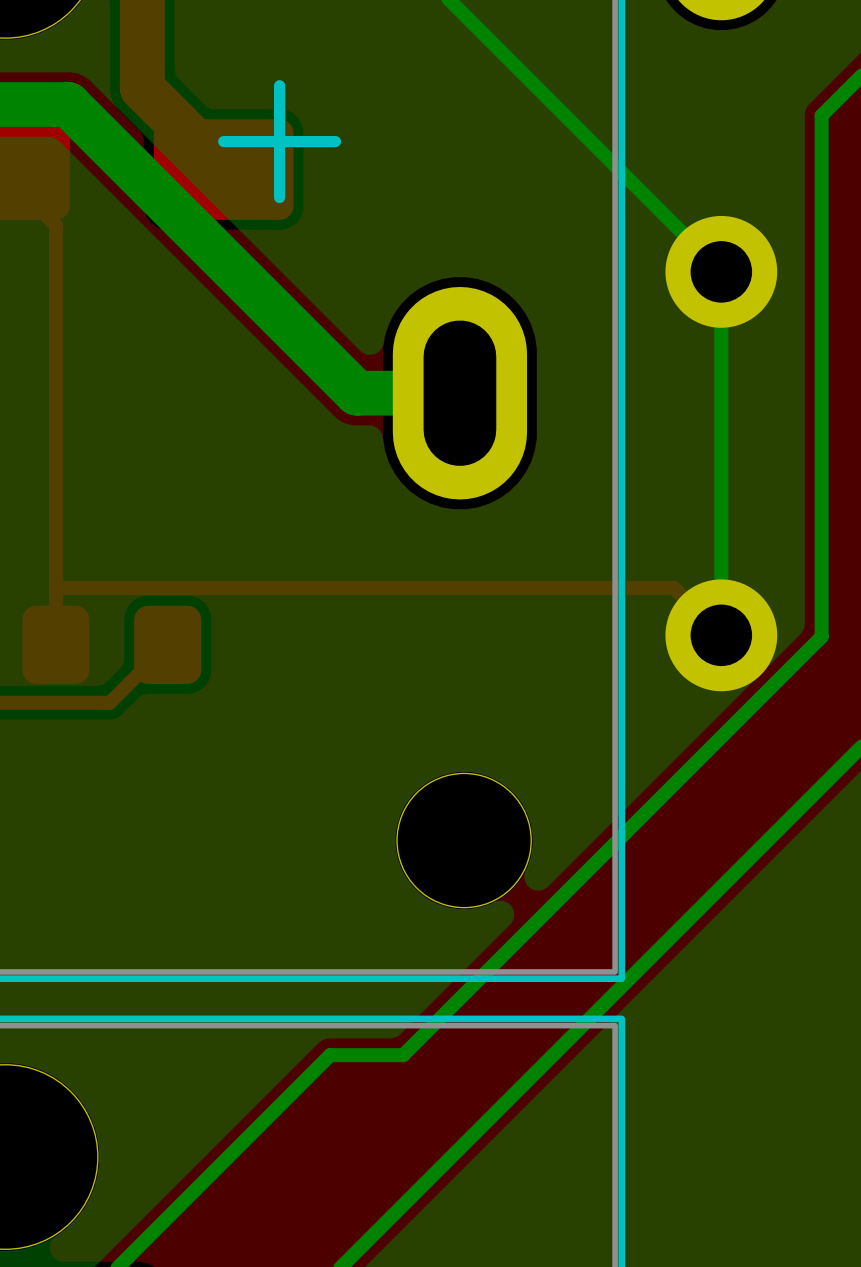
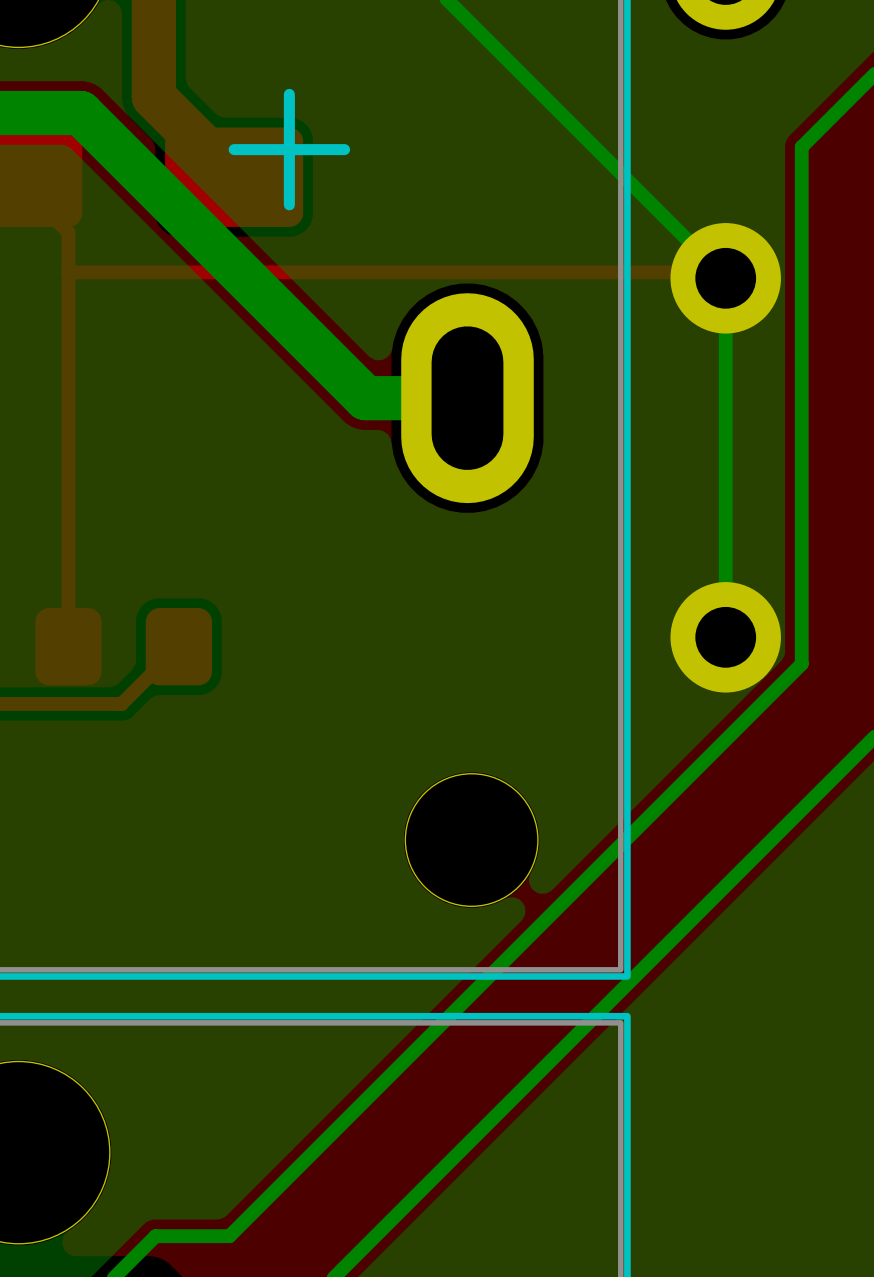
bottom track: (821, 115) (821, 636) (403, 1055) (330, 1055) (144, 1241) -> (824, 123) (801, 147) (801, 663) (229, 1236) (155, 1236)
top track: none -> (68, 272) (719, 272) (725, 278)
top track: (55, 588) (674, 588) (721, 635) -> none

